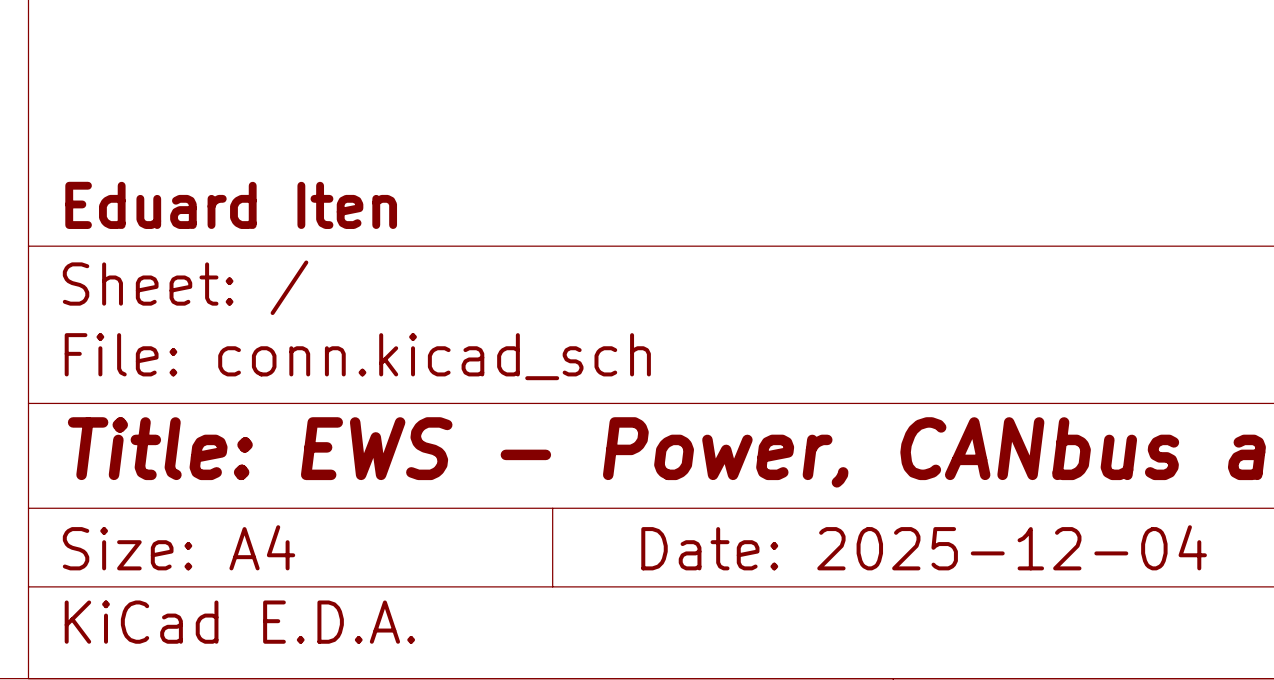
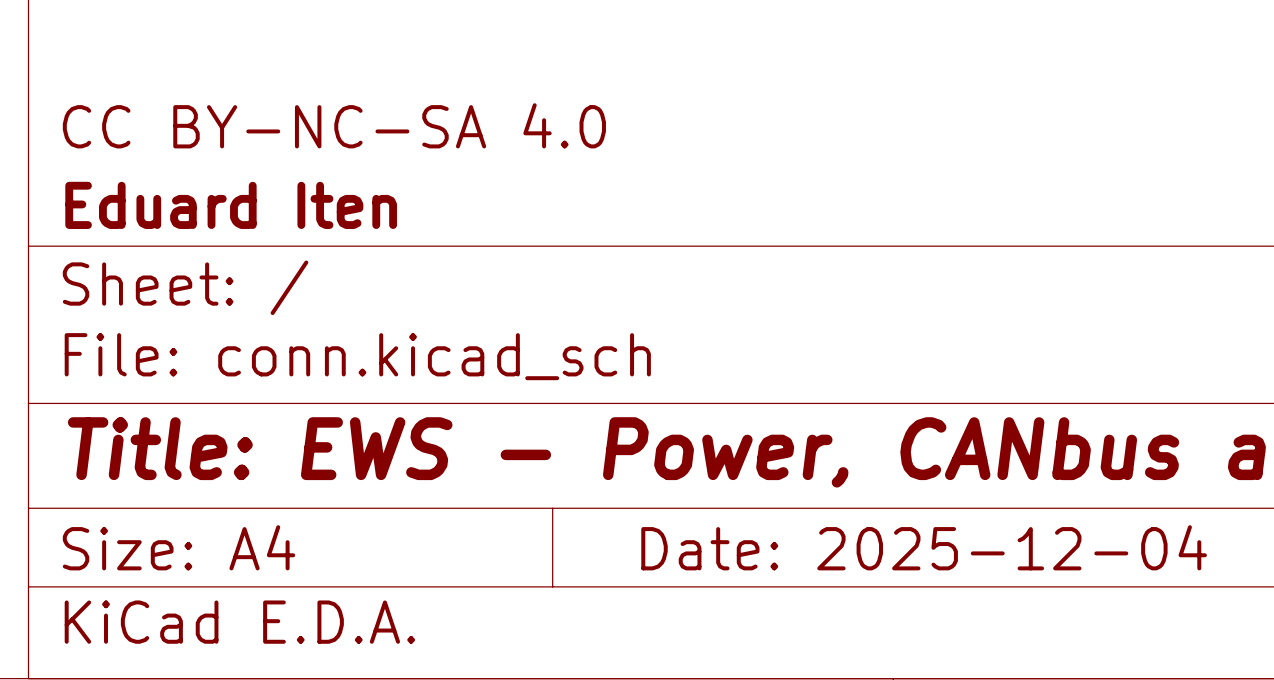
title block: none -> CC BY-NC-SA 4.0 (334, 125)

